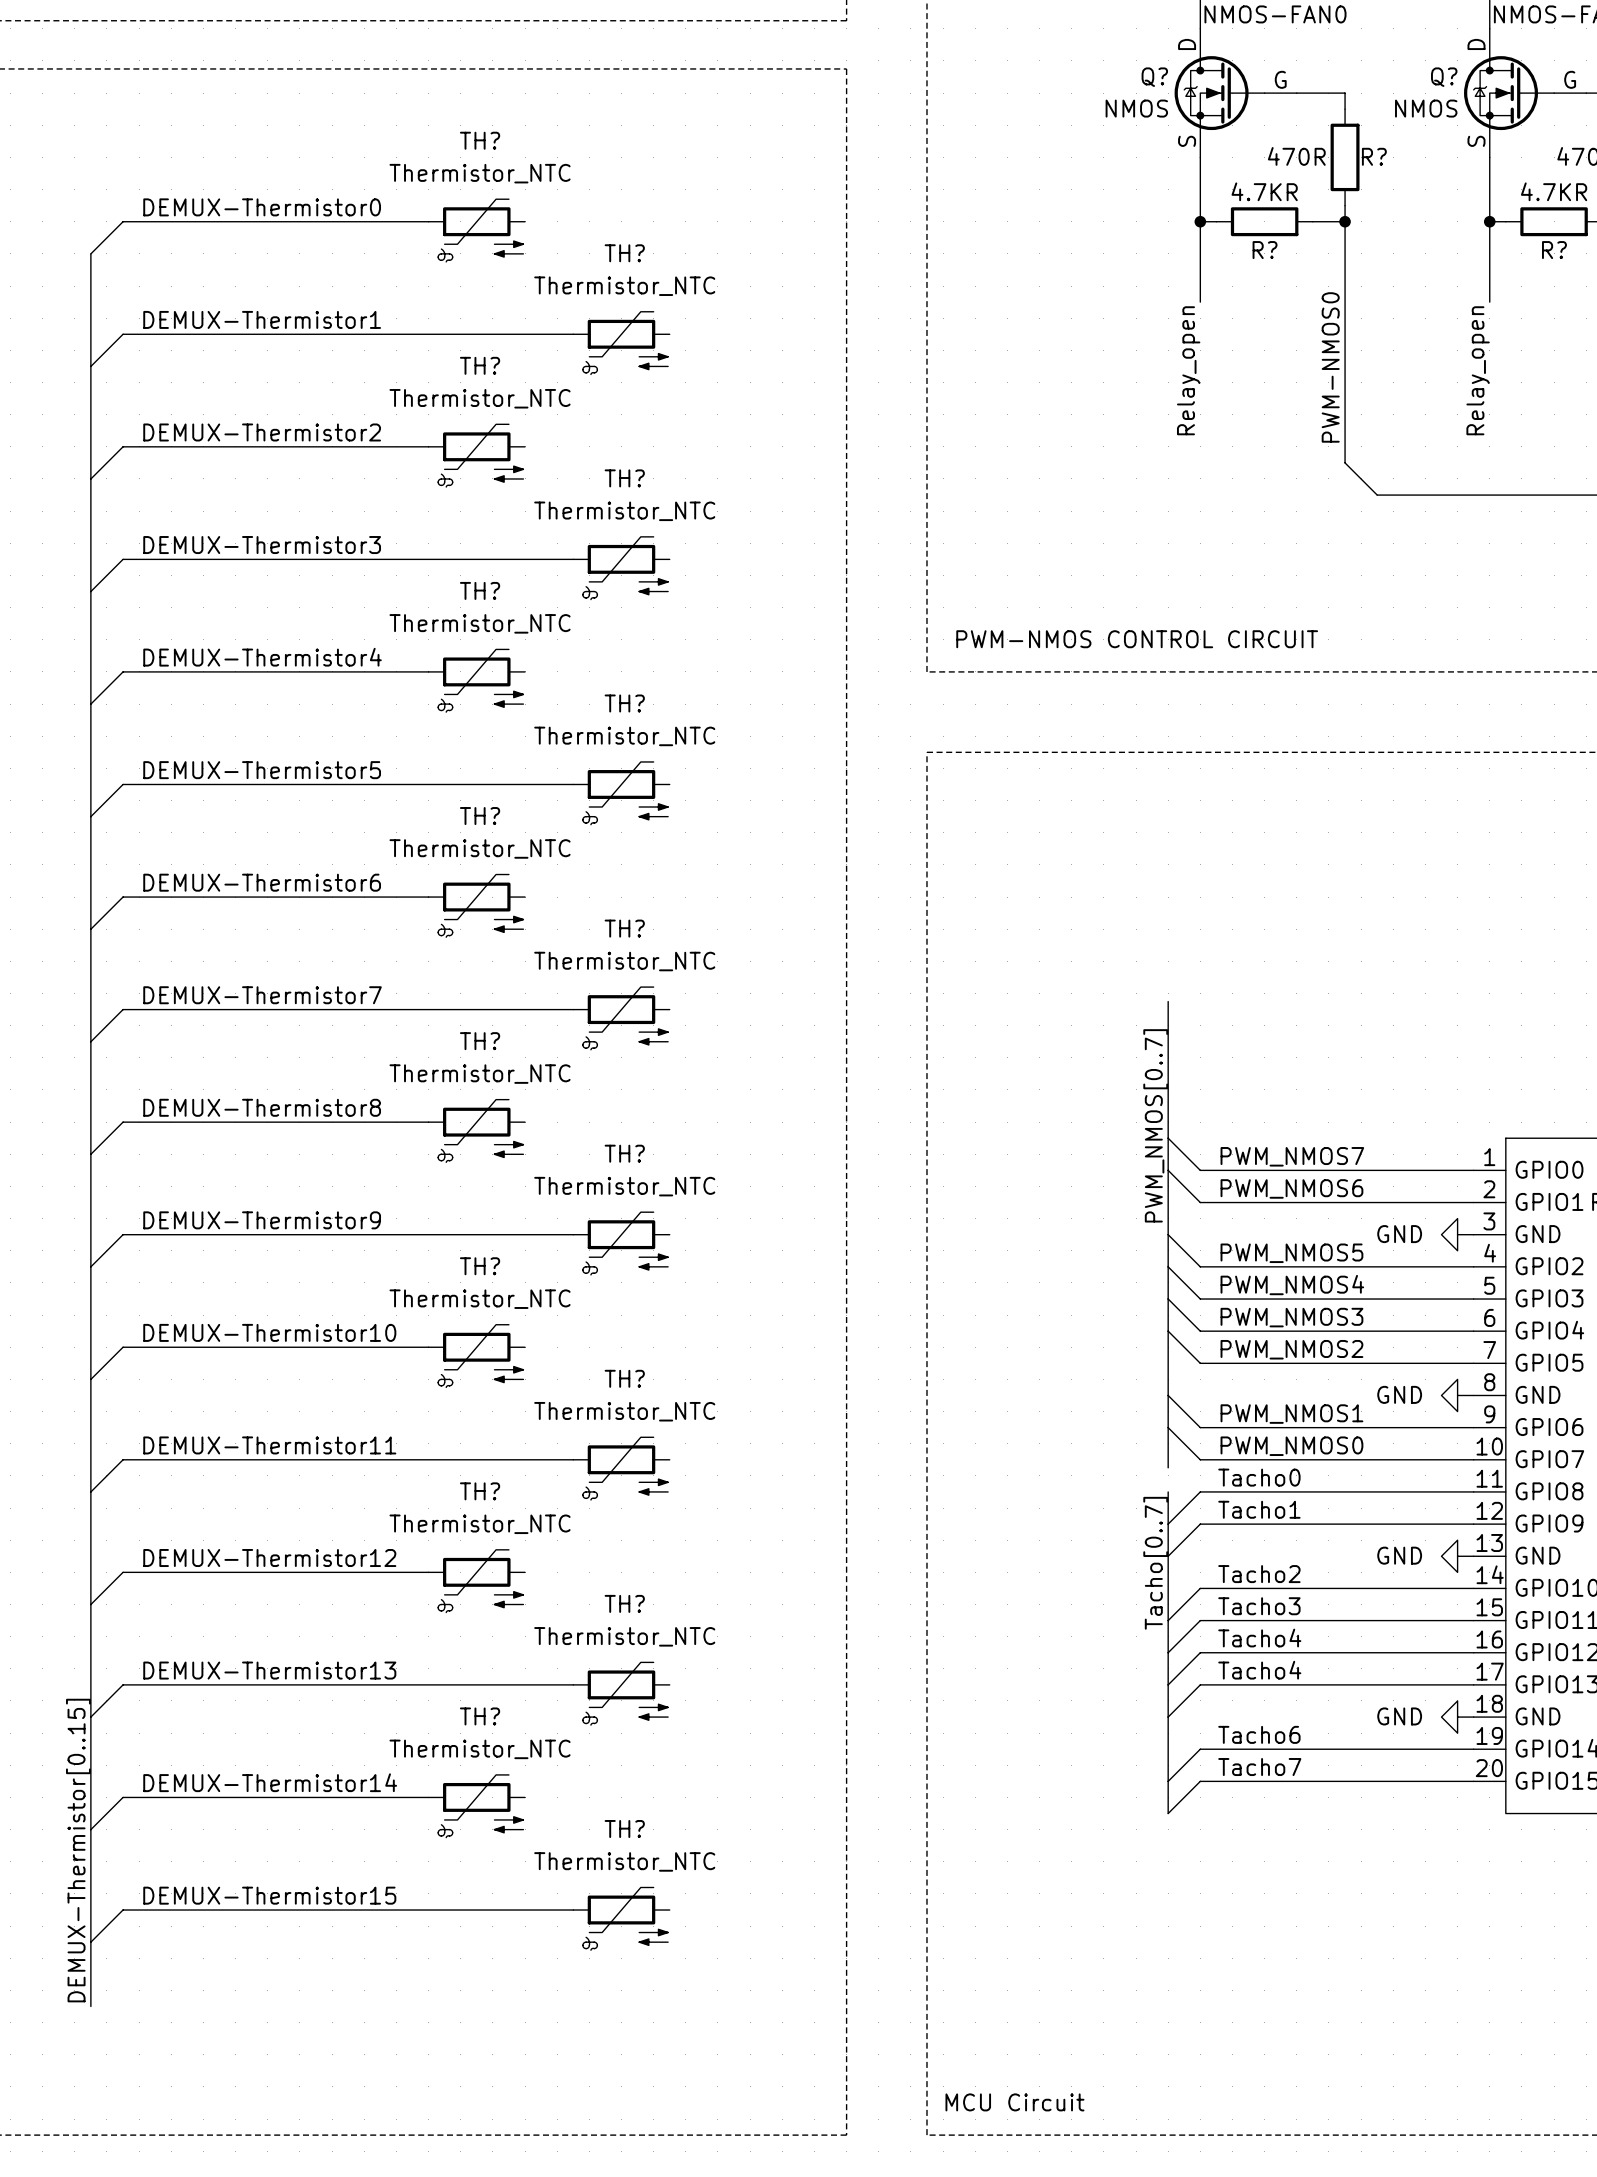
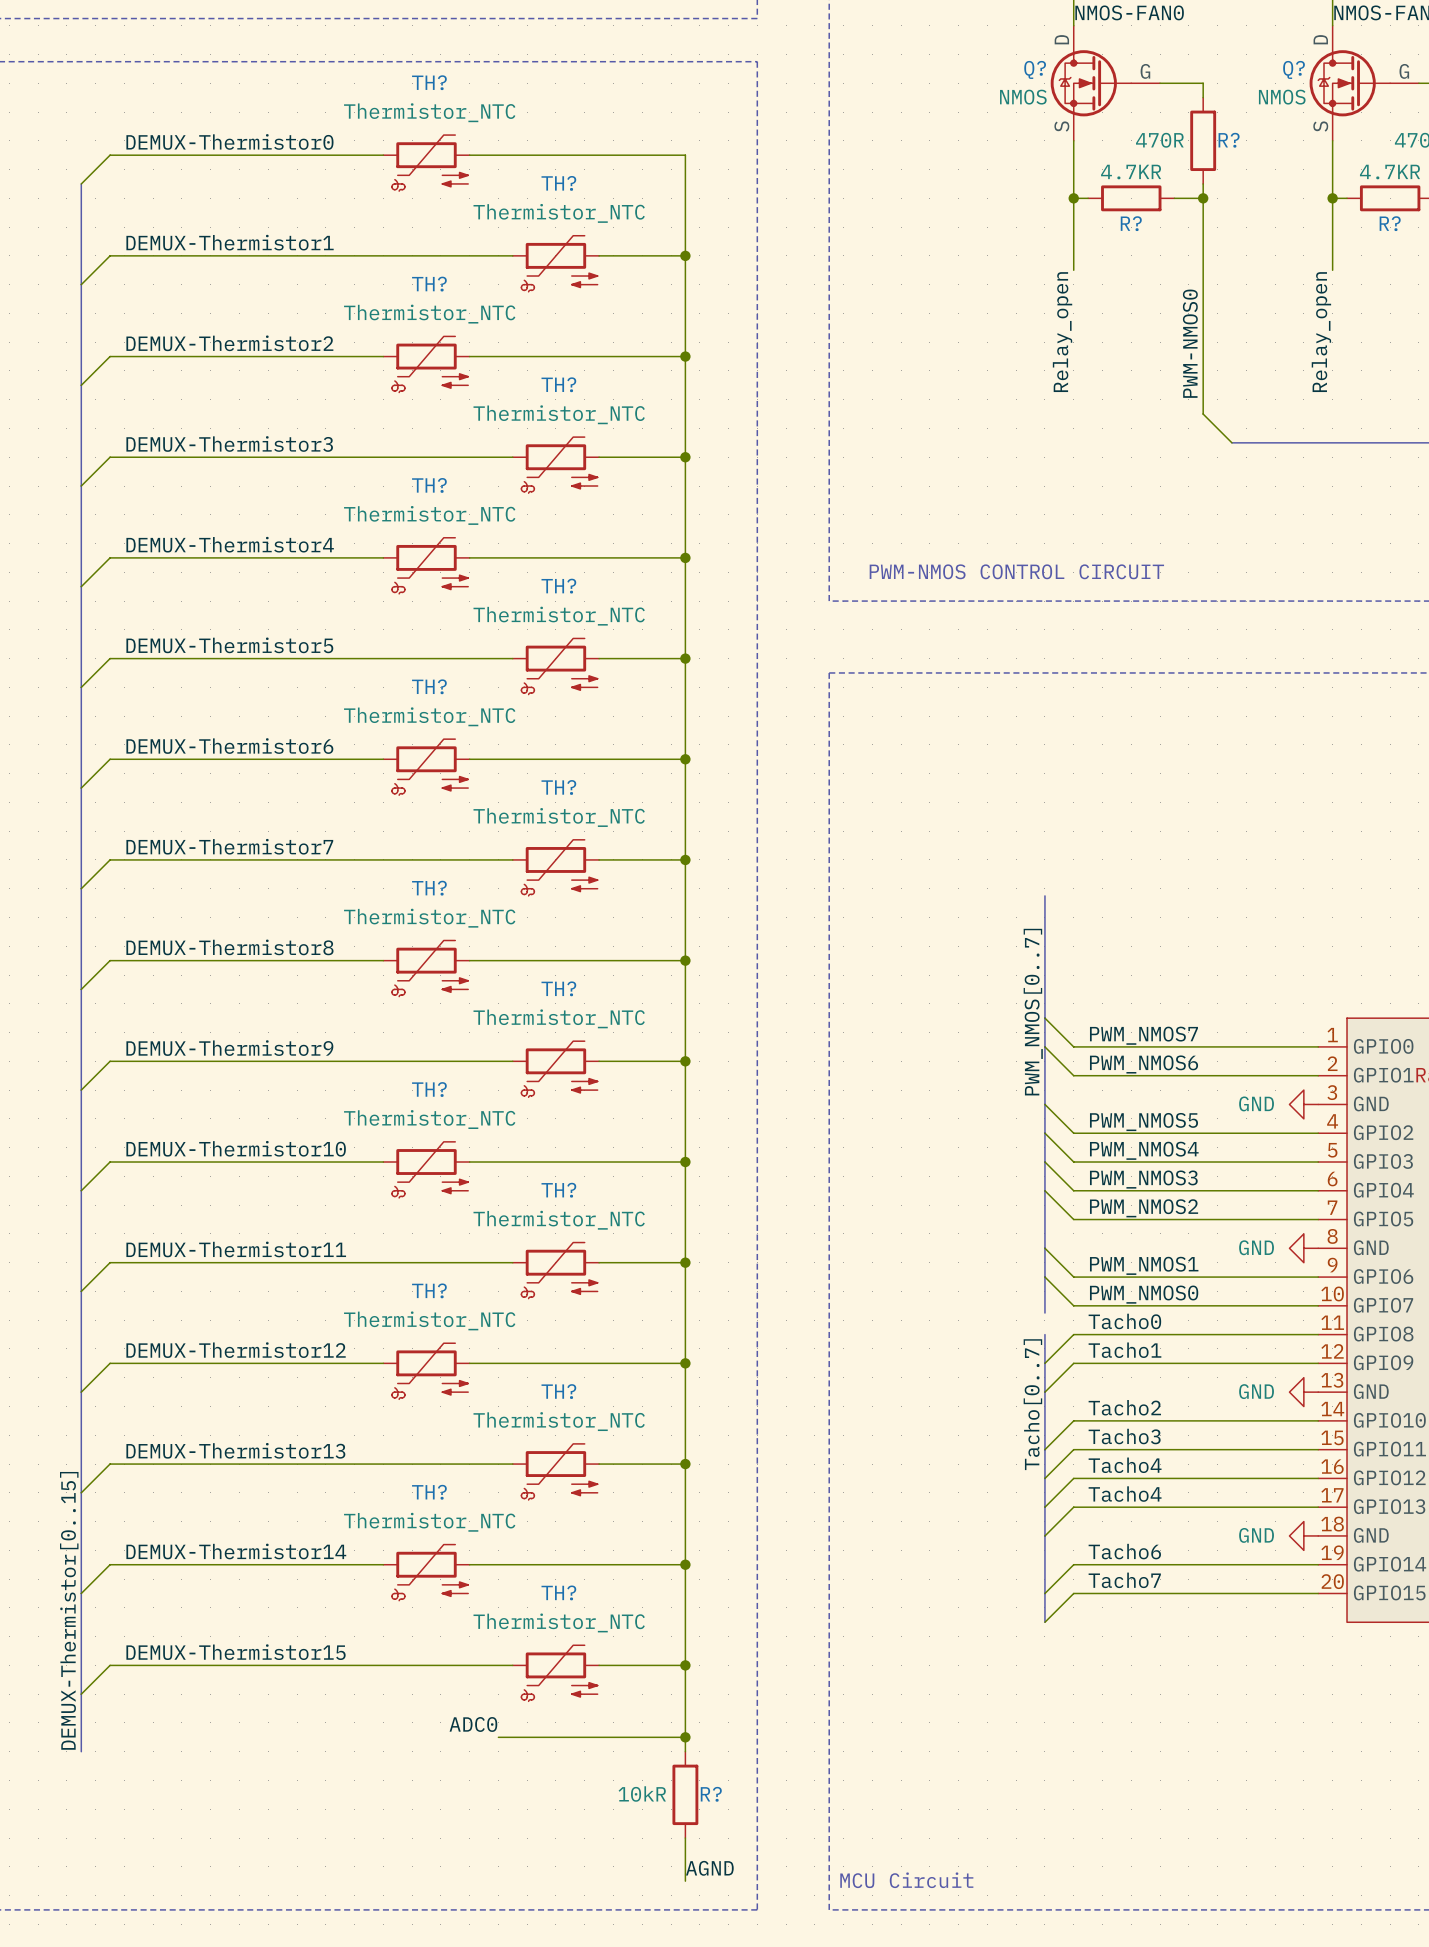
wire: none -> (469, 155) (685, 155) (685, 1751)
bus: none -> (81, 183) (81, 227)
label position: DEMUX-Thermistor0 (262, 207) -> DEMUX-Thermistor0 (229, 141)
wire: (428, 221) (123, 221) (90, 253) -> (383, 155) (110, 155) (81, 183)
TH? position: (476, 230) -> (426, 163)
wire: none -> (599, 255) (685, 255)
junction: none -> (685, 255)
label position: DEMUX-Thermistor1 (262, 319) -> DEMUX-Thermistor1 (230, 242)
wire: (573, 334) (123, 334) (90, 366) -> (512, 255) (110, 255) (81, 284)
TH? position: (621, 343) -> (555, 263)
wire: none -> (469, 356) (685, 356)
junction: none -> (685, 356)
label position: DEMUX-Thermistor2 (262, 432) -> DEMUX-Thermistor2 (229, 343)
wire: (428, 446) (123, 446) (90, 478) -> (383, 356) (110, 356) (81, 385)
TH? position: (476, 455) -> (426, 364)
wire: none -> (599, 457) (685, 457)
junction: none -> (685, 457)
label position: DEMUX-Thermistor3 (262, 545) -> DEMUX-Thermistor3 (229, 444)
wire: (573, 559) (123, 559) (90, 591) -> (512, 457) (110, 457) (81, 486)
TH? position: (621, 568) -> (555, 465)
wire: none -> (469, 557) (685, 557)
junction: none -> (685, 557)
label position: DEMUX-Thermistor4 (262, 657) -> DEMUX-Thermistor4 (230, 544)
wire: (428, 671) (123, 671) (90, 704) -> (383, 557) (110, 557) (81, 586)
TH? position: (476, 680) -> (426, 565)
wire: none -> (599, 658) (685, 658)
junction: none -> (685, 658)
label position: DEMUX-Thermistor5 (262, 770) -> DEMUX-Thermistor5 (229, 645)
wire: (573, 784) (123, 784) (90, 816) -> (512, 658) (110, 658) (81, 687)
TH? position: (621, 793) -> (555, 666)
wire: none -> (469, 759) (685, 759)
junction: none -> (685, 759)
label position: DEMUX-Thermistor6 (262, 882) -> DEMUX-Thermistor6 (229, 746)
wire: (428, 897) (123, 897) (90, 929) -> (383, 759) (110, 759) (81, 788)
TH? position: (476, 905) -> (426, 767)
wire: none -> (599, 859) (685, 859)
junction: none -> (685, 859)
label position: DEMUX-Thermistor7 (262, 995) -> DEMUX-Thermistor7 (229, 846)
wire: (573, 1009) (123, 1009) (90, 1041) -> (512, 859) (110, 859) (81, 888)
TH? position: (621, 1018) -> (555, 867)
wire: none -> (469, 960) (685, 960)
junction: none -> (685, 960)
label position: DEMUX-Thermistor8 (262, 1107) -> DEMUX-Thermistor8 (229, 947)
wire: (428, 1122) (123, 1122) (90, 1154) -> (383, 960) (110, 960) (81, 989)
TH? position: (476, 1130) -> (426, 968)
wire: none -> (599, 1061) (685, 1061)
junction: none -> (685, 1061)
label position: DEMUX-Thermistor9 (262, 1220) -> DEMUX-Thermistor9 (229, 1048)
wire: (573, 1234) (123, 1234) (90, 1266) -> (512, 1061) (110, 1061) (81, 1090)
TH? position: (621, 1243) -> (555, 1069)
wire: none -> (469, 1162) (685, 1162)
junction: none -> (685, 1162)
label position: DEMUX-Thermistor10 (269, 1332) -> DEMUX-Thermistor10 (236, 1148)
wire: (428, 1347) (123, 1347) (90, 1379) -> (383, 1162) (110, 1162) (81, 1190)
TH? position: (476, 1356) -> (426, 1169)
wire: none -> (599, 1262) (685, 1262)
junction: none -> (685, 1262)
label position: DEMUX-Thermistor11 (269, 1445) -> DEMUX-Thermistor11 (236, 1249)
wire: (573, 1459) (123, 1459) (90, 1491) -> (512, 1262) (110, 1262) (81, 1291)
TH? position: (621, 1468) -> (555, 1270)
wire: none -> (469, 1363) (685, 1363)
junction: none -> (685, 1363)
label position: DEMUX-Thermistor12 (269, 1558) -> DEMUX-Thermistor12 (236, 1350)
wire: (428, 1572) (123, 1572) (90, 1604) -> (383, 1363) (110, 1363) (81, 1392)
TH? position: (476, 1581) -> (426, 1371)
wire: none -> (599, 1464) (685, 1464)
junction: none -> (685, 1464)
label position: DEMUX-Thermistor13 (269, 1670) -> DEMUX-Thermistor13 (235, 1450)
wire: (573, 1684) (123, 1684) (90, 1717) -> (512, 1464) (110, 1464) (81, 1492)
TH? position: (621, 1693) -> (555, 1471)
wire: none -> (469, 1564) (685, 1564)
junction: none -> (685, 1564)
label position: DEMUX-Thermistor14 (270, 1782) -> DEMUX-Thermistor14 (236, 1551)
wire: (428, 1797) (123, 1797) (90, 1829) -> (383, 1564) (110, 1564) (81, 1593)
TH? position: (476, 1806) -> (426, 1572)
label position: DEMUX-Thermistor[0..15] (78, 1850) -> DEMUX-Thermistor[0..15] (69, 1610)
wire: none -> (599, 1665) (685, 1665)
junction: none -> (685, 1665)
label position: DEMUX-Thermistor15 (269, 1895) -> DEMUX-Thermistor15 (236, 1652)
wire: (573, 1910) (123, 1910) (90, 1942) -> (512, 1665) (110, 1665) (81, 1694)
TH? position: (621, 1918) -> (555, 1673)
label: none -> ADC0 (473, 1724)
wire: none -> (498, 1737) (685, 1737)
junction: none -> (685, 1737)
bus: (90, 1958) (90, 2006) -> none
R?: none -> 10kR (685, 1794)
wire: none -> (685, 1838) (685, 1881)
label: none -> AGND (709, 1868)

